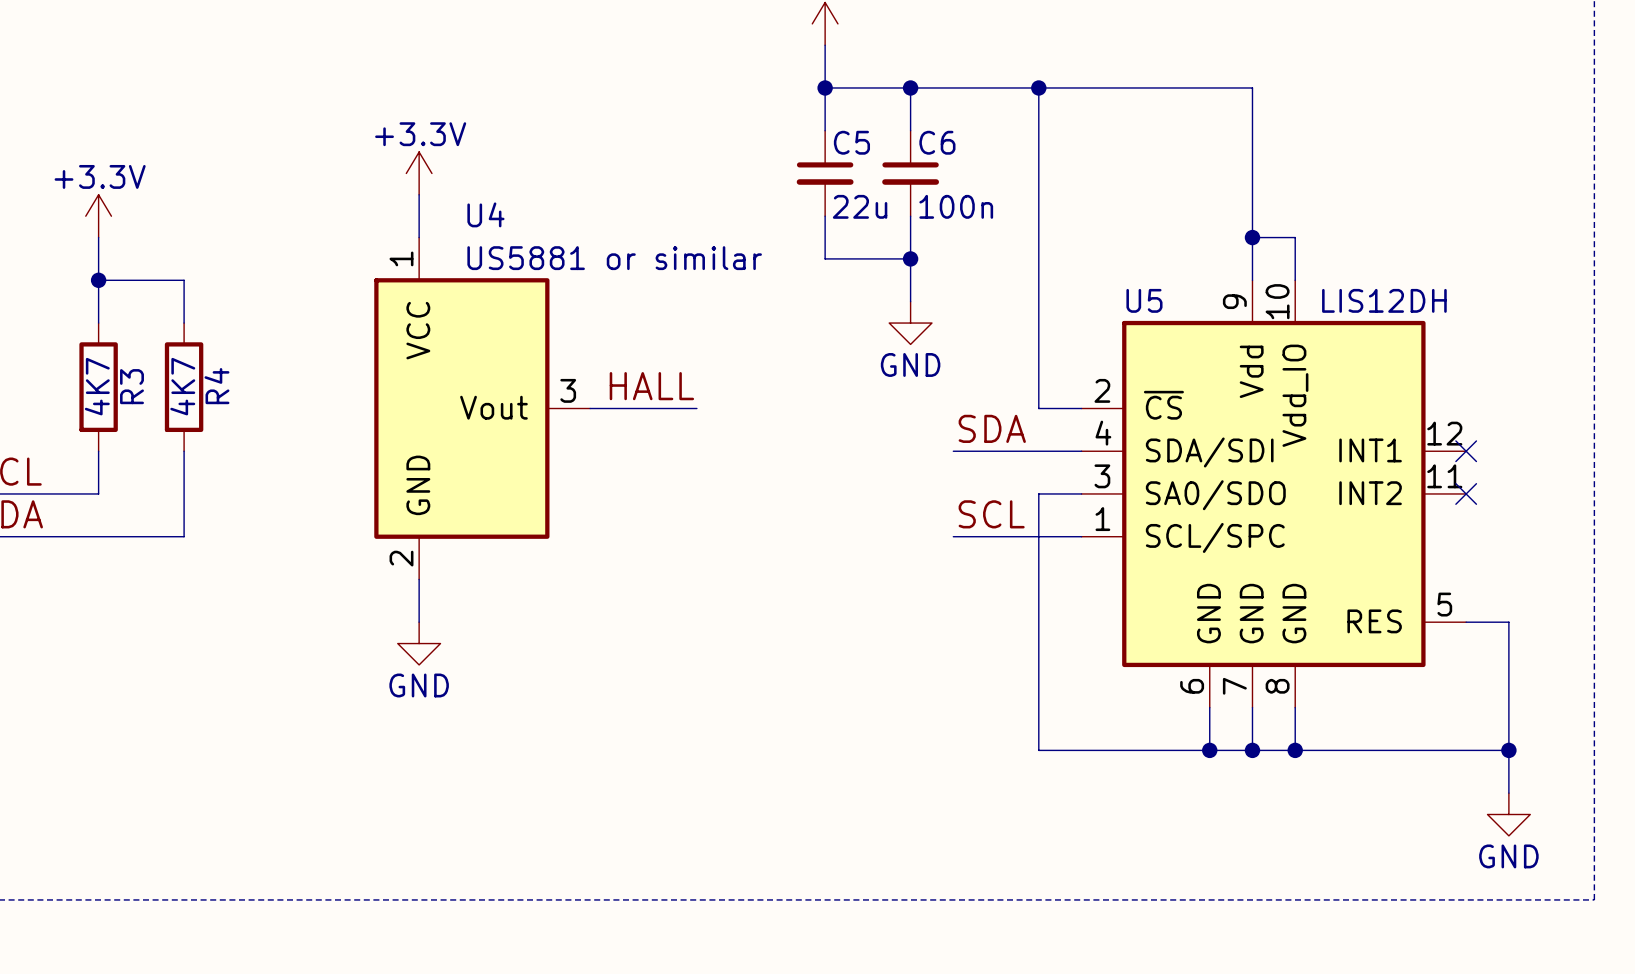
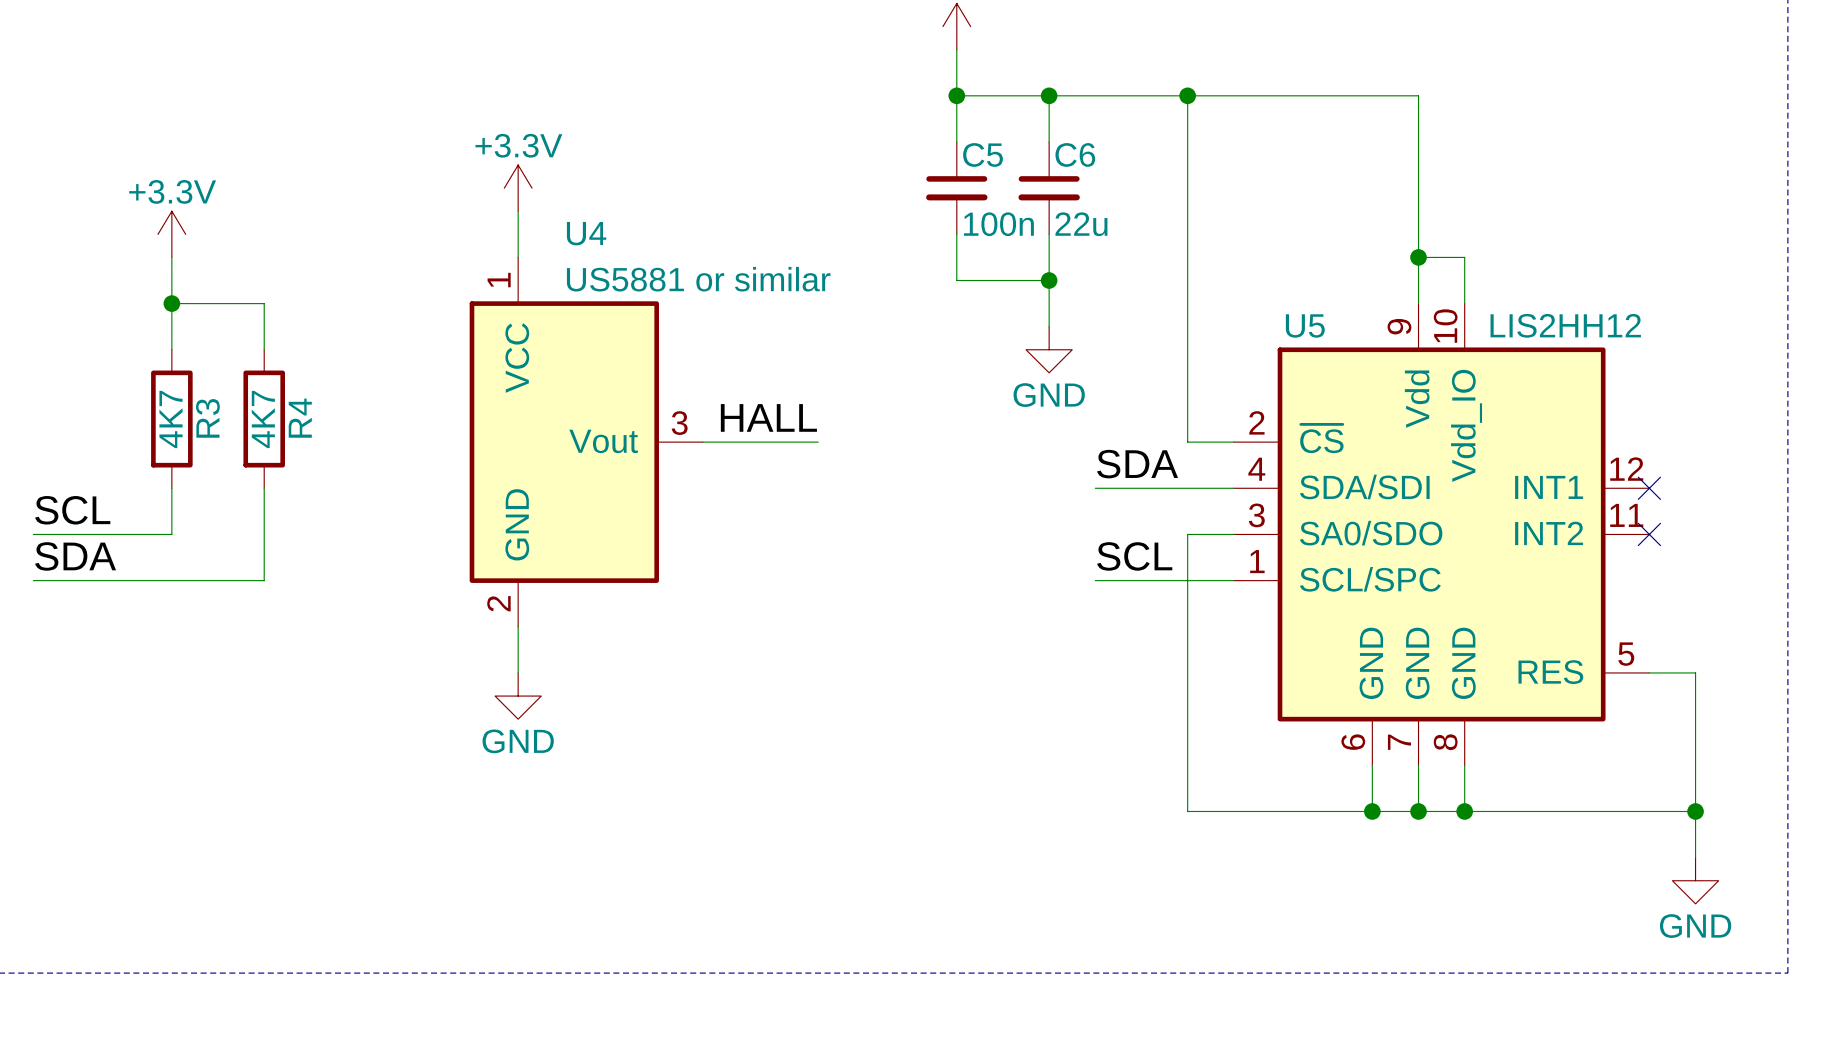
C5 value: 22u (860, 206) -> 100n (998, 224)
C6 value: 100n (956, 206) -> 22u (1081, 224)
U5 value: LIS12DH (1384, 300) -> LIS2HH12 (1565, 325)

